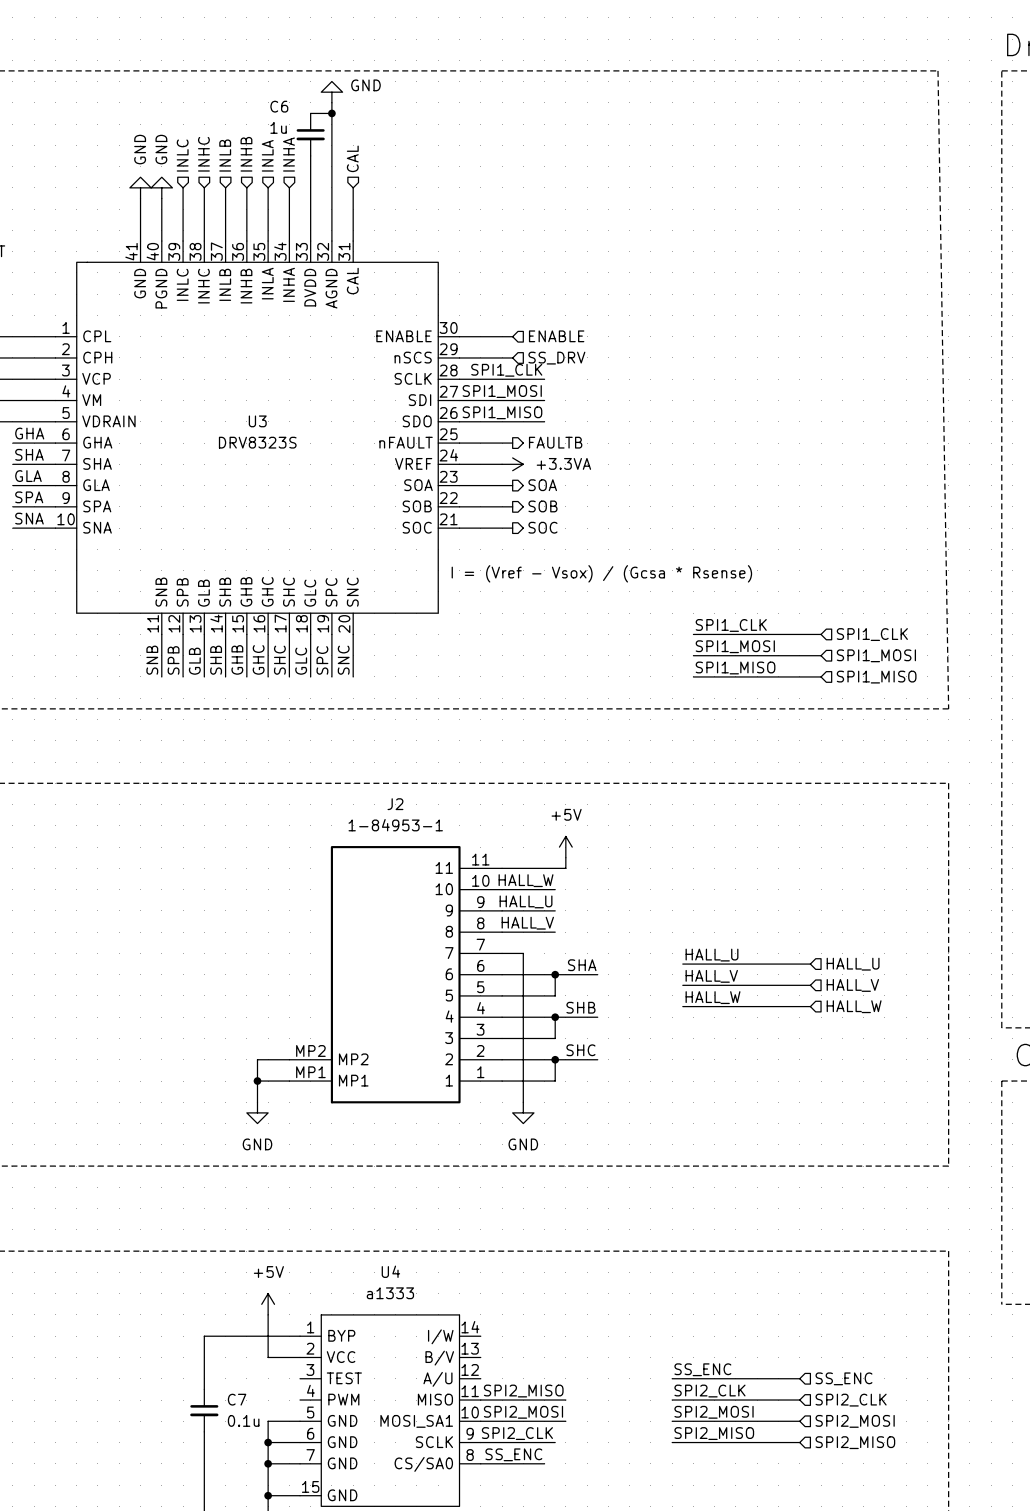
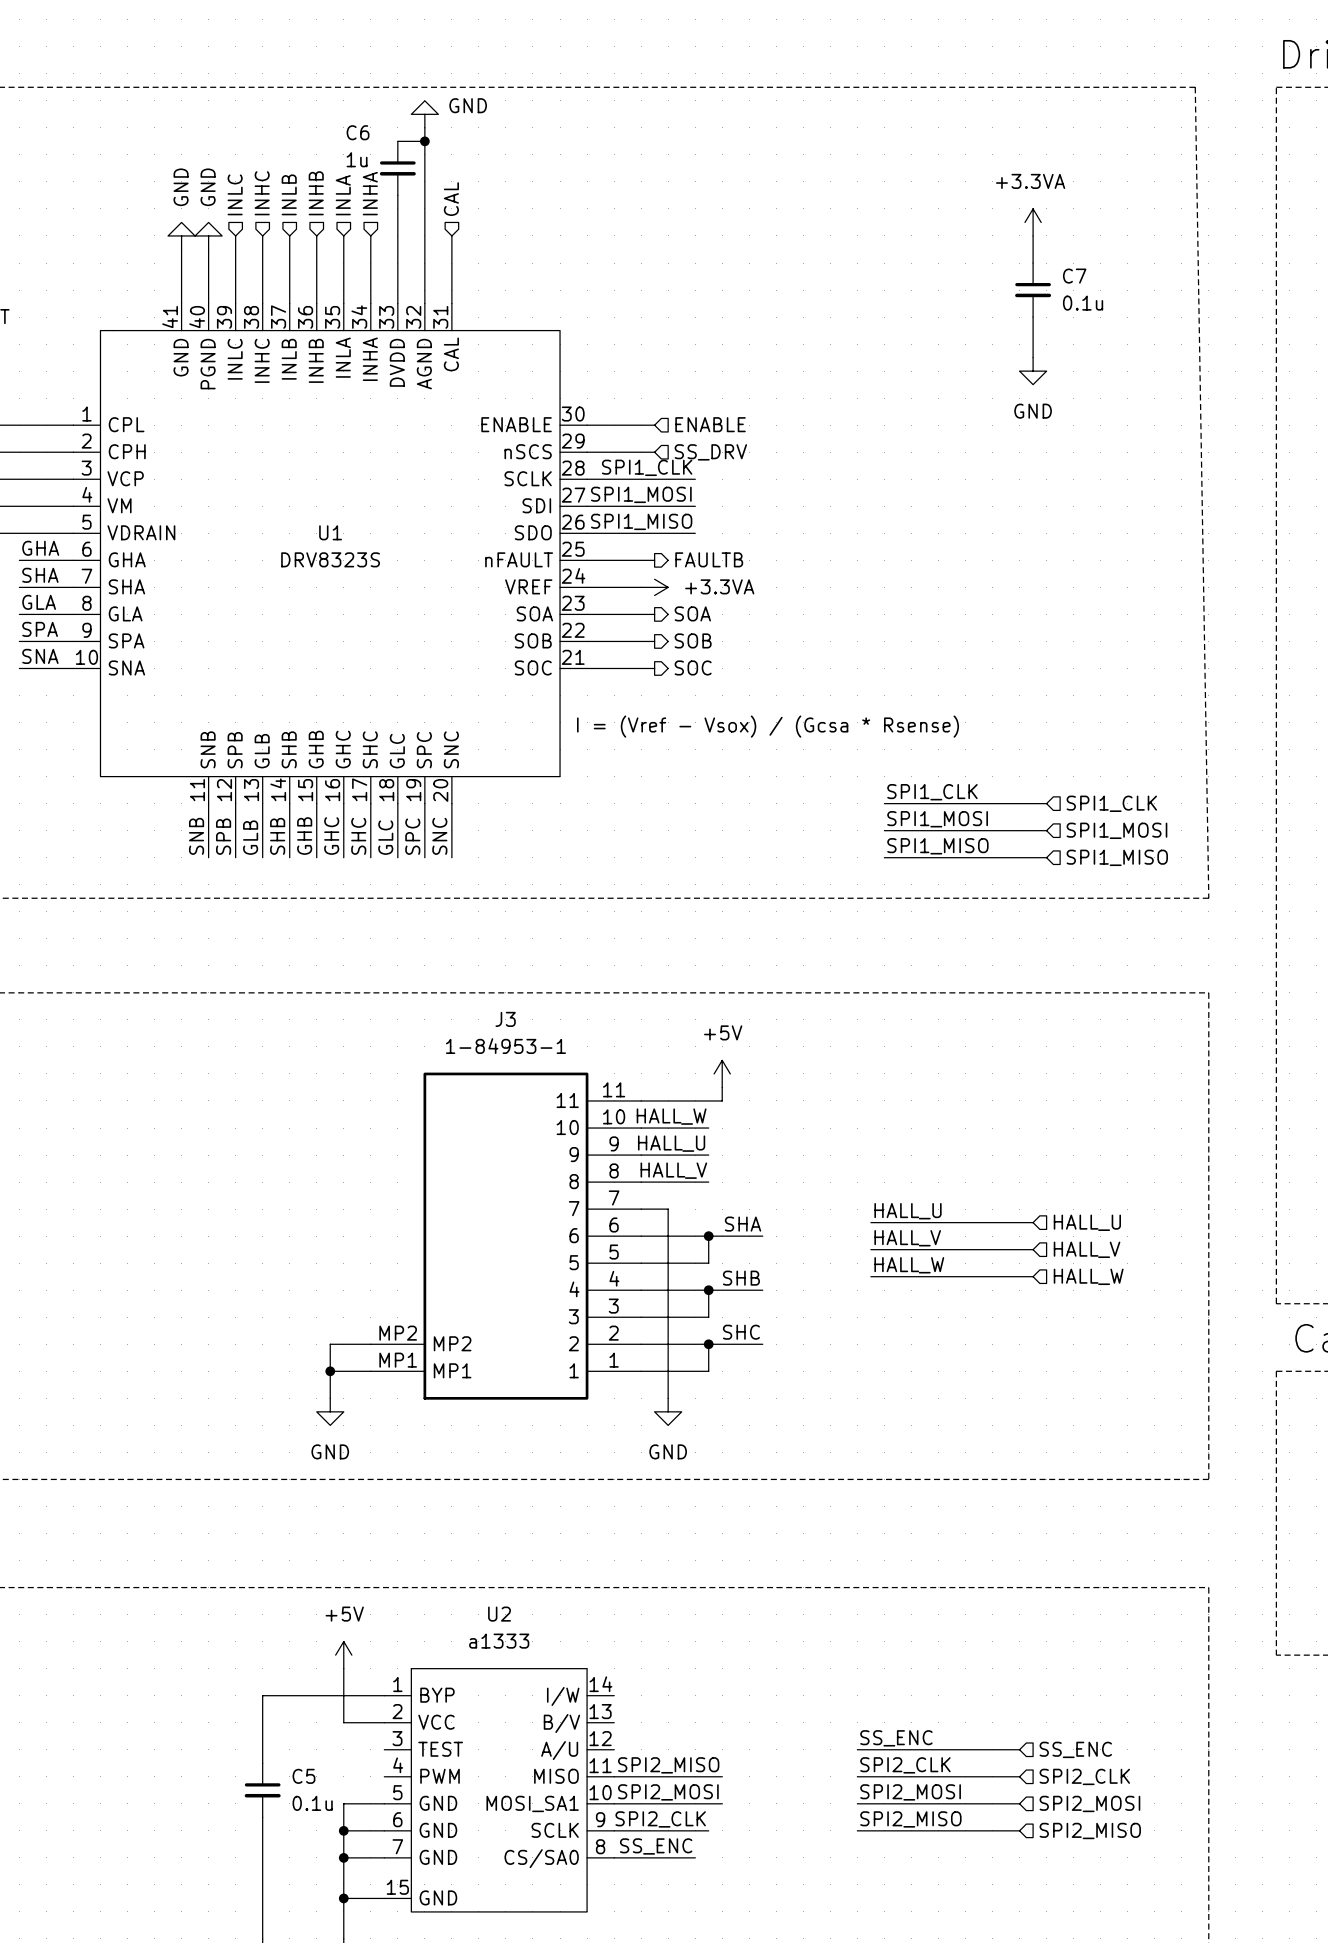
power symbol: none -> +3.3VA (1033, 222)
wire: none -> (1033, 235) (1033, 263)
C7: none -> 0.1u (1033, 290)
wire: none -> (1033, 317) (1033, 357)
power symbol: none -> GND (1033, 371)
U3 name: U3 (257, 421) -> U1 (330, 532)
J2 name: J2 (395, 804) -> J3 (505, 1019)
U4 name: U4 (390, 1271) -> U2 (499, 1614)
C7 name: C7 (237, 1399) -> C5 (303, 1776)

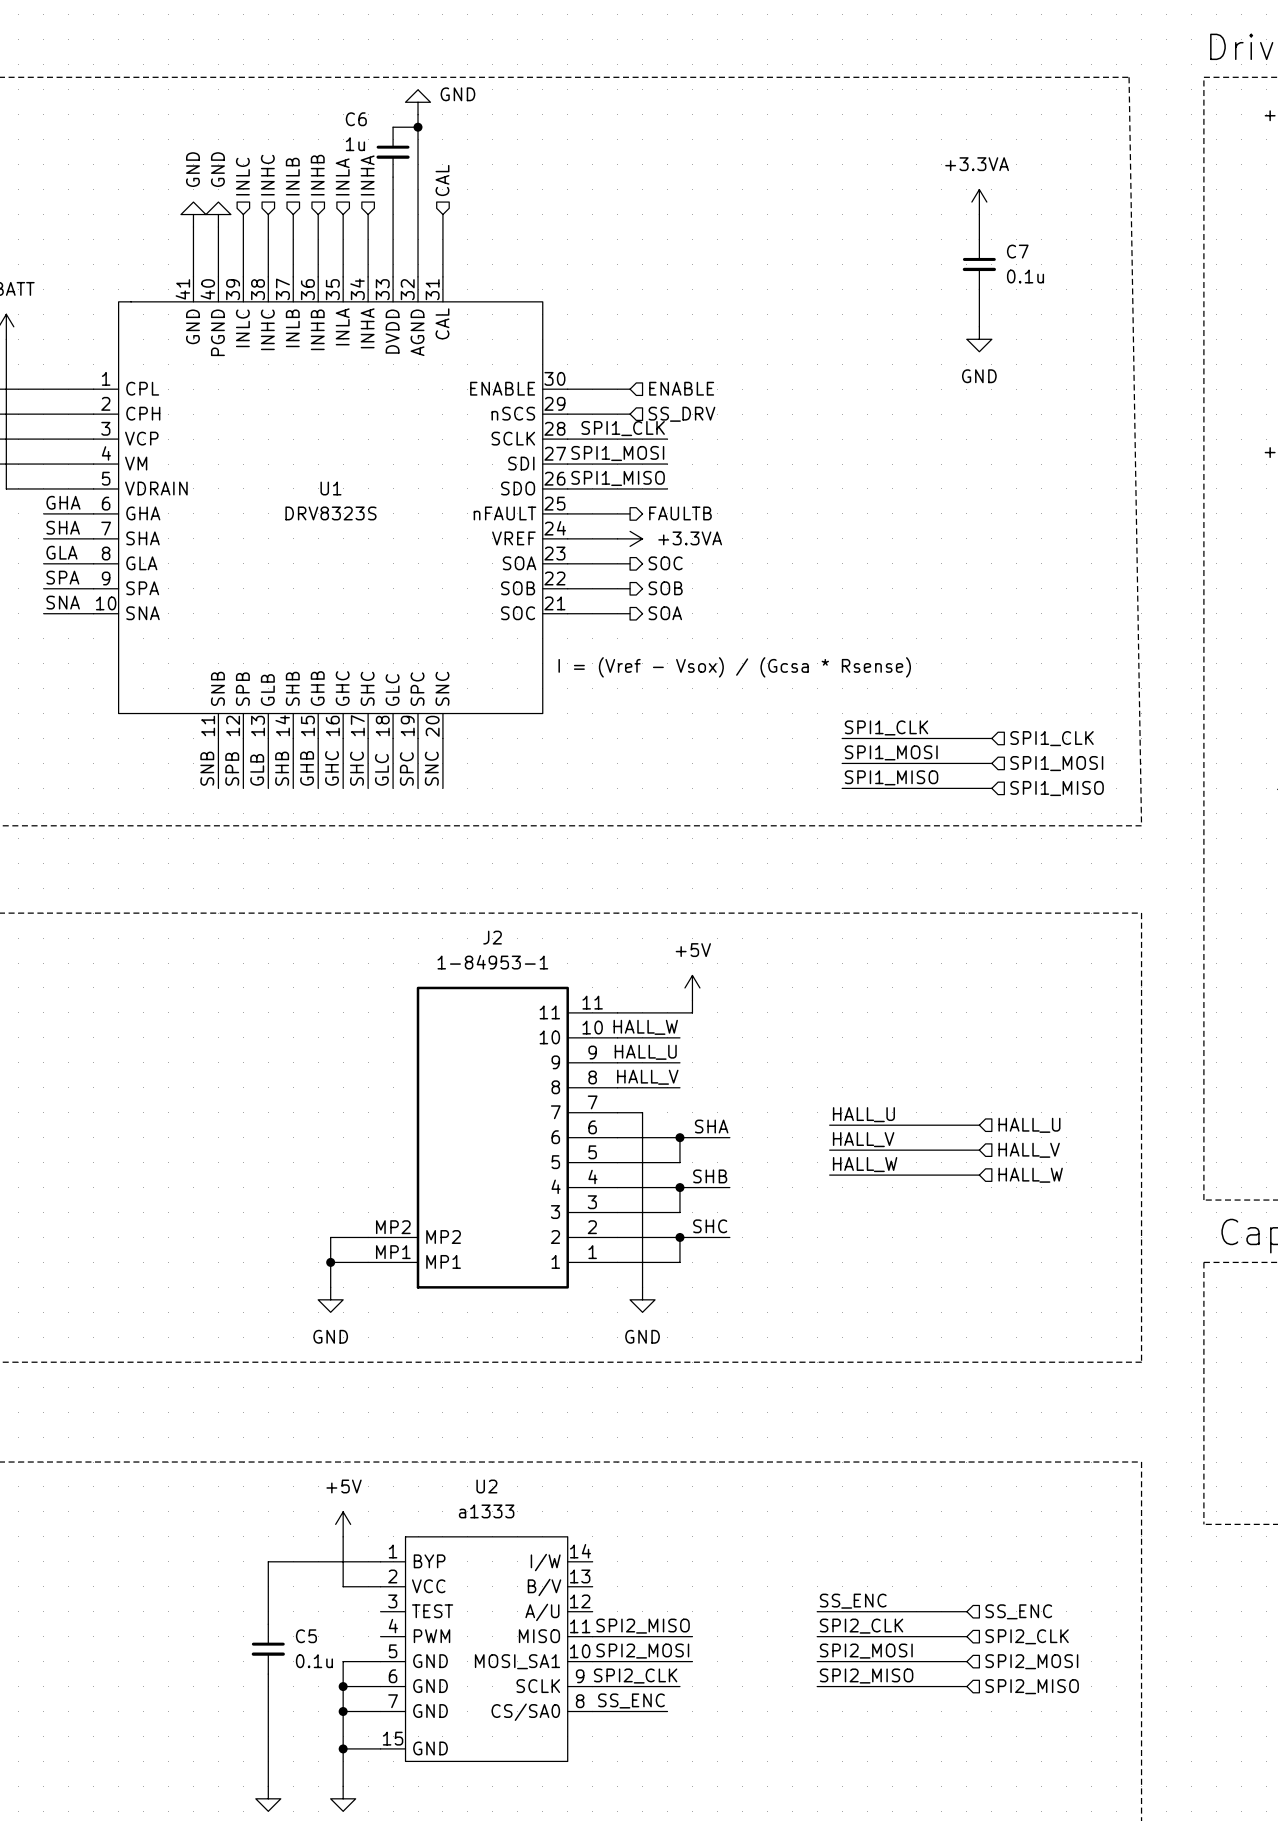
hierarchical label: SOA (692, 613) -> SOC (665, 563)
hierarchical label: SOC (693, 667) -> SOA (665, 613)
J3 name: J3 (505, 1019) -> J2 (492, 937)

